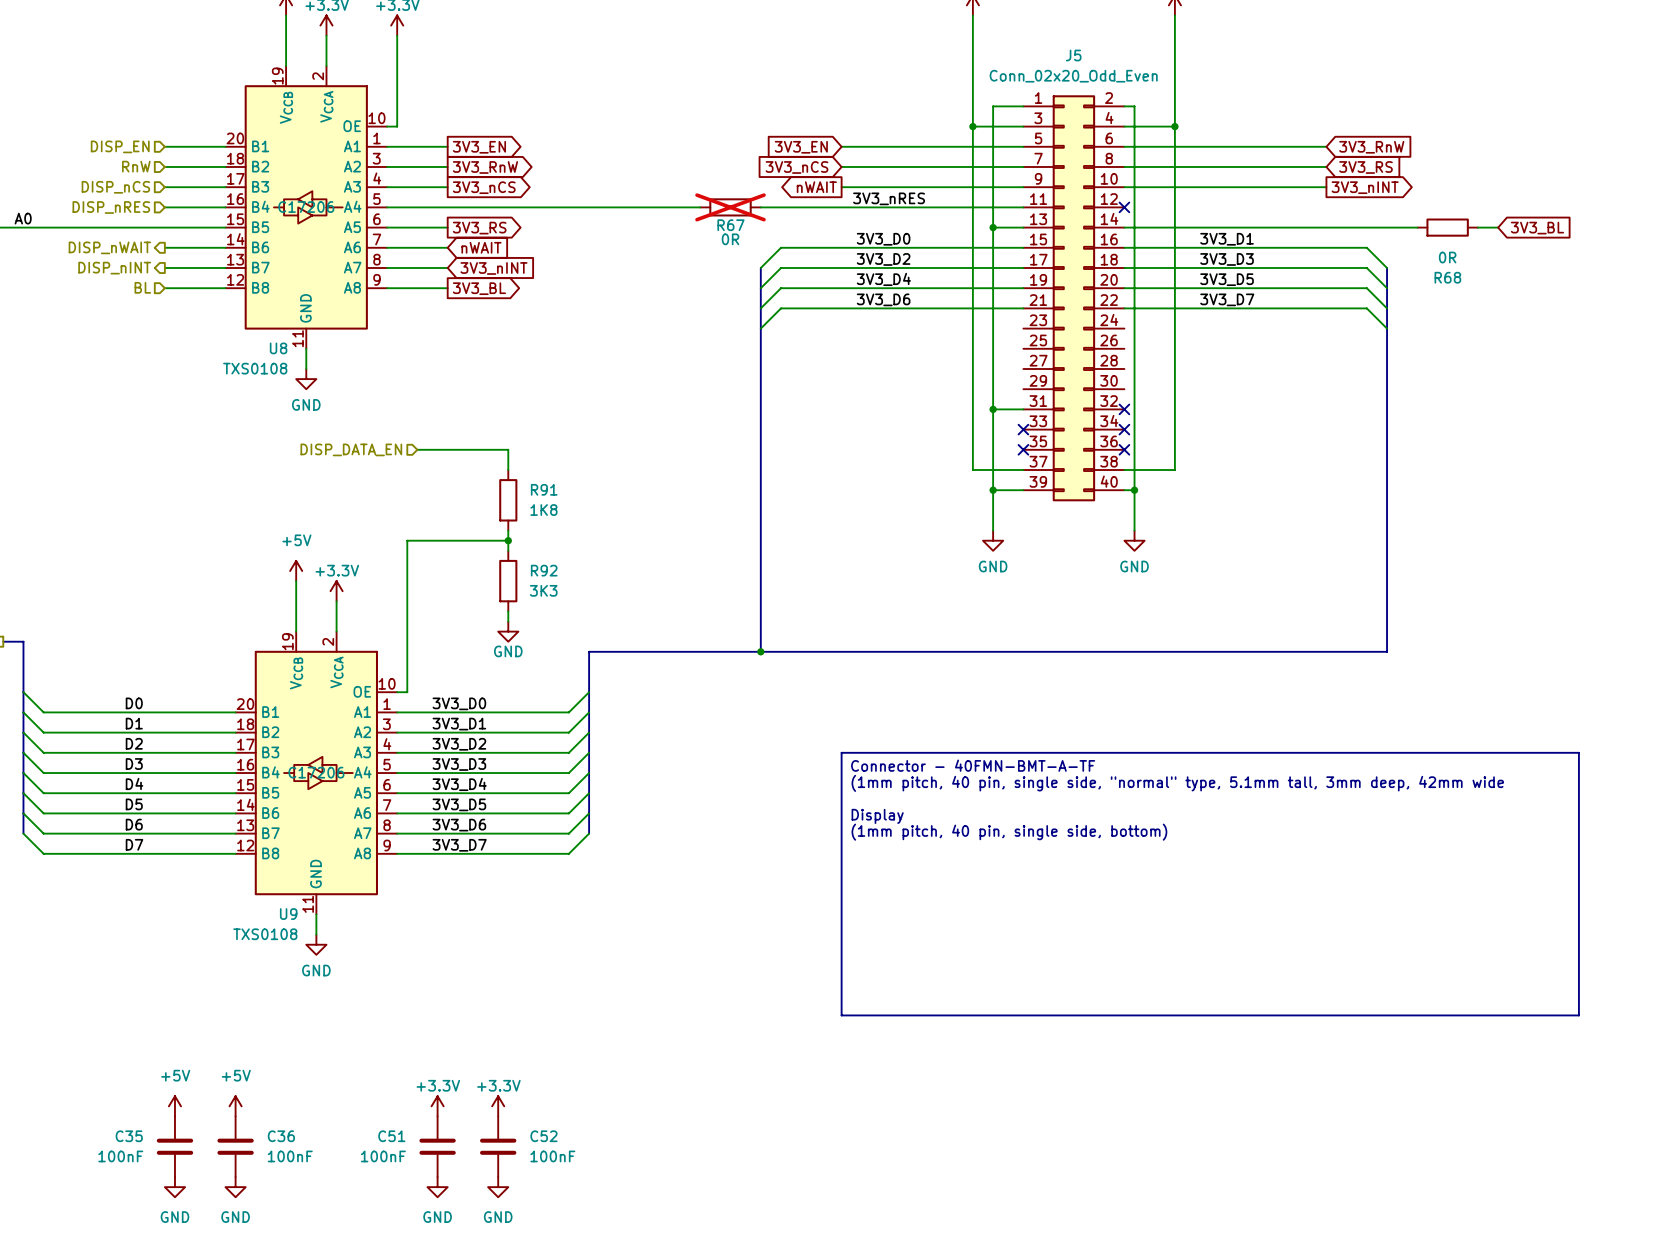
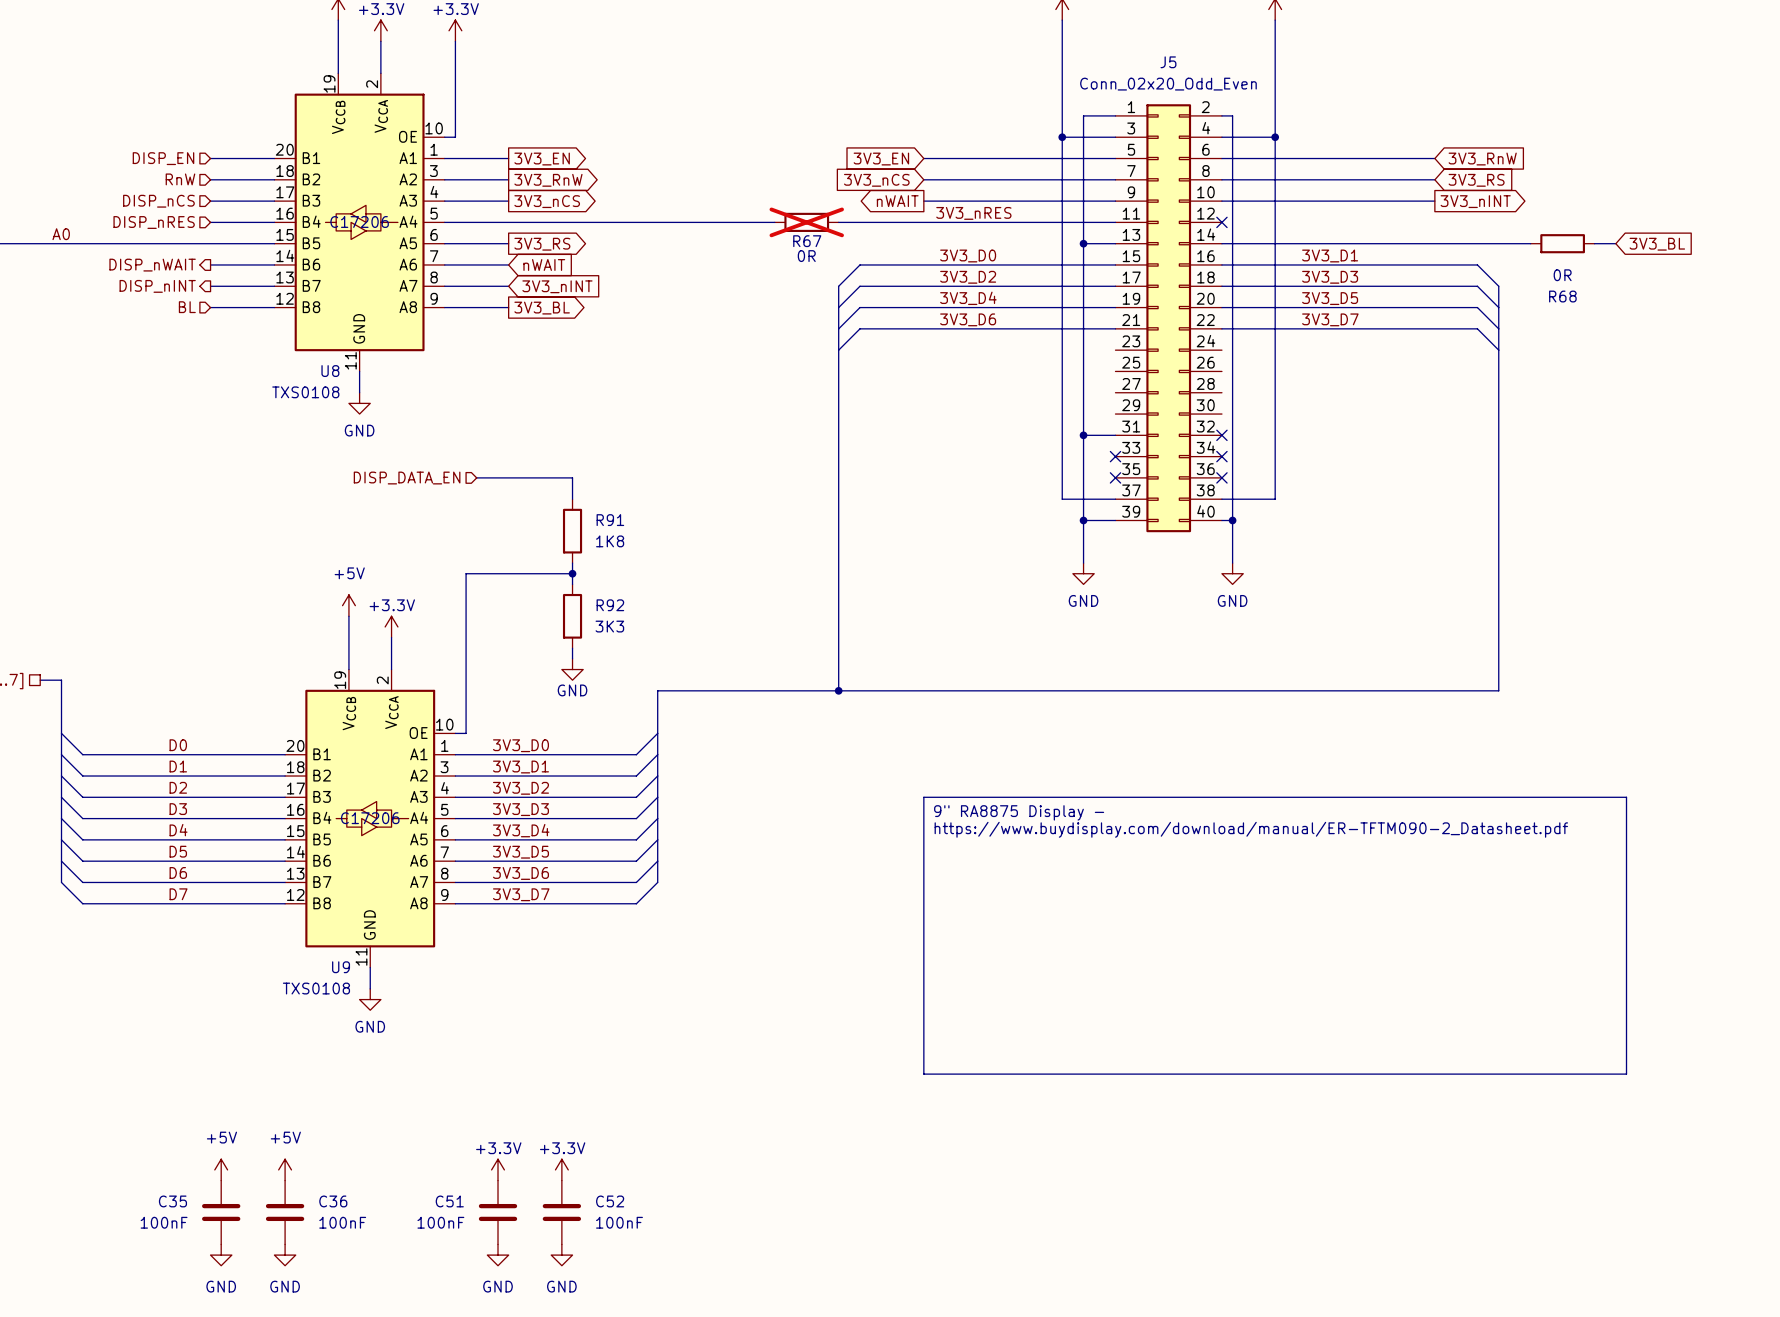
line: (1508, 752) (1578, 752) (1578, 1015) (1508, 1015) -> (1626, 797) (1626, 1074)
text: Connector - 40FMN-BMT-A-TF (973, 765) -> 9" RA8875 Display - (1019, 812)
text: (1mm pitch, 40 pin, single side, "normal" type, 5.1mm tall, 3mm deep, 42mm wide (1177, 783) -> https://www.buydisplay.com/download/manual/ER-TFTM090-2_Datasheet.pdf (1251, 829)
text: Display (877, 816) -> none
text: (1mm pitch, 40 pin, single side, bottom) (1009, 832) -> none

